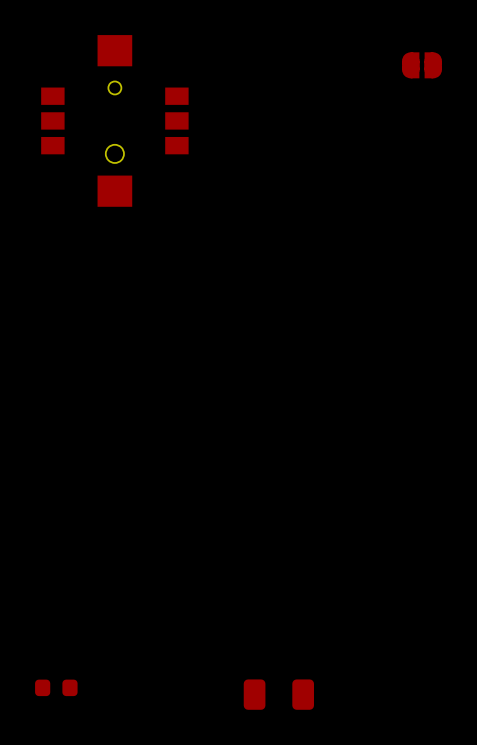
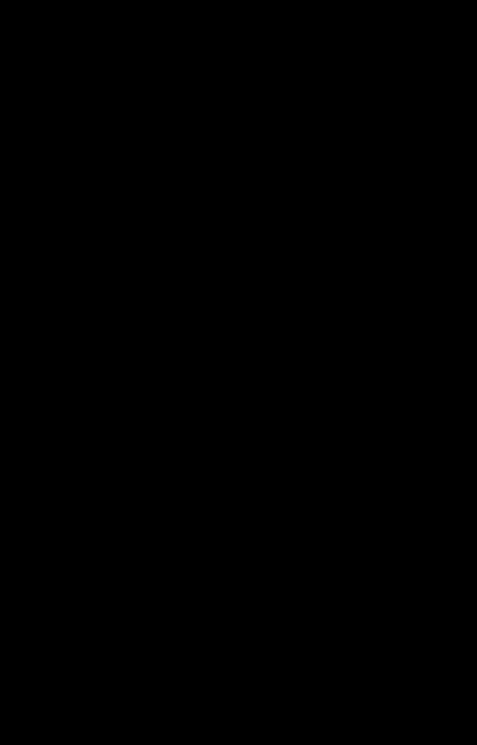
part: (422, 65) -> none
part: (114, 120) -> none
part: (56, 687) -> none
part: (278, 694) -> none

